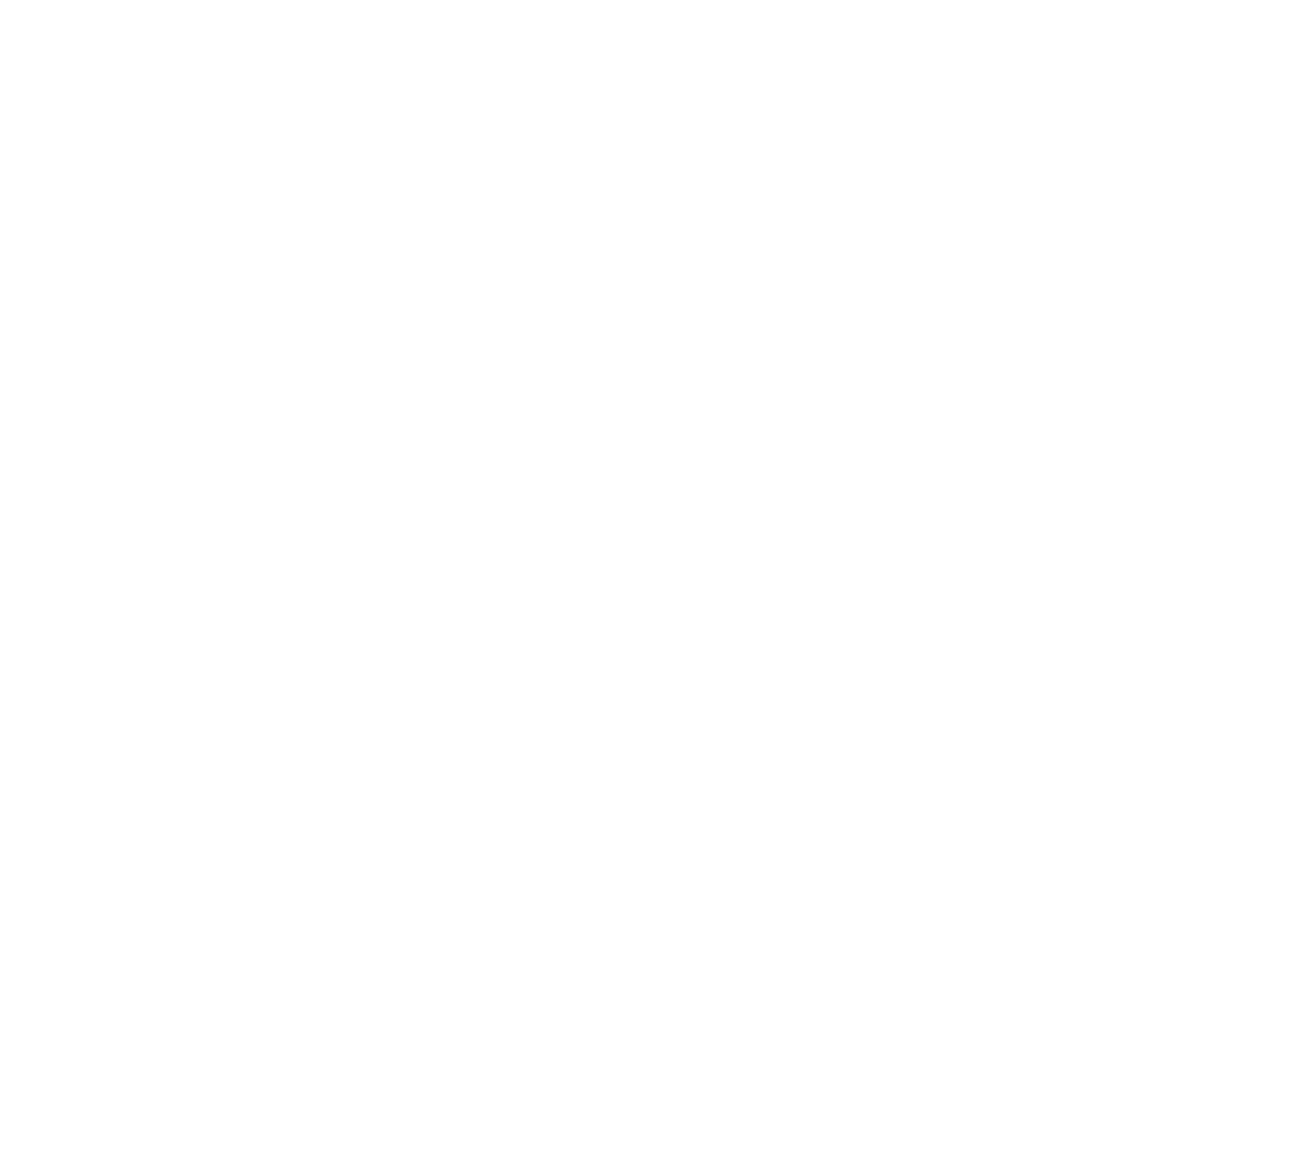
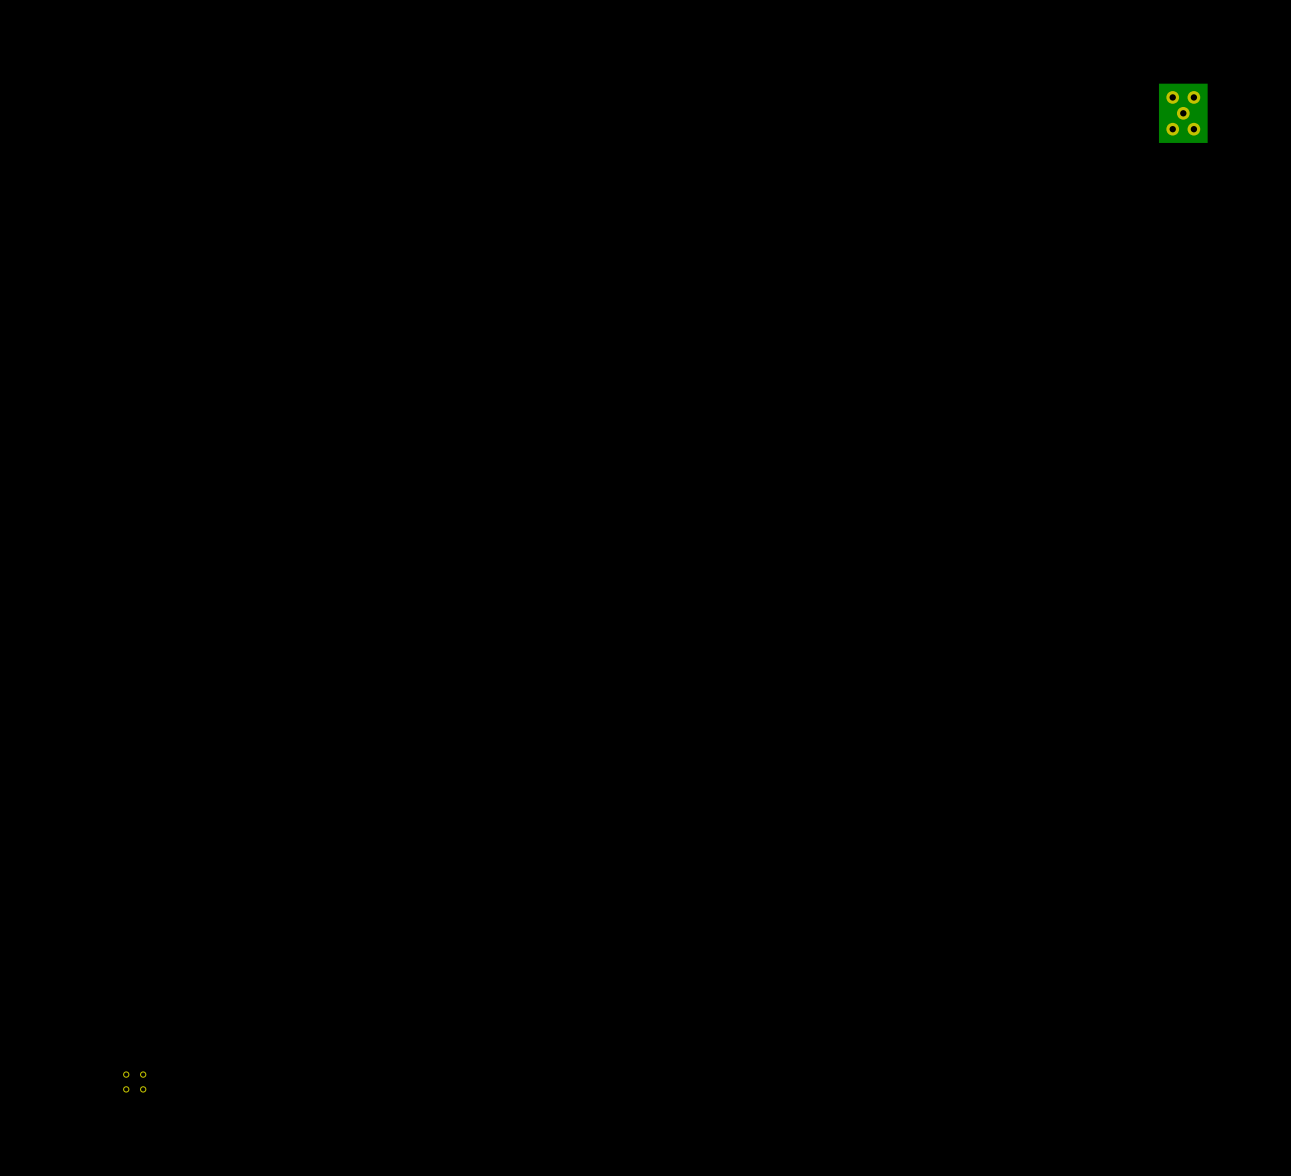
part: none -> (1183, 113)
part: none -> (134, 1081)

